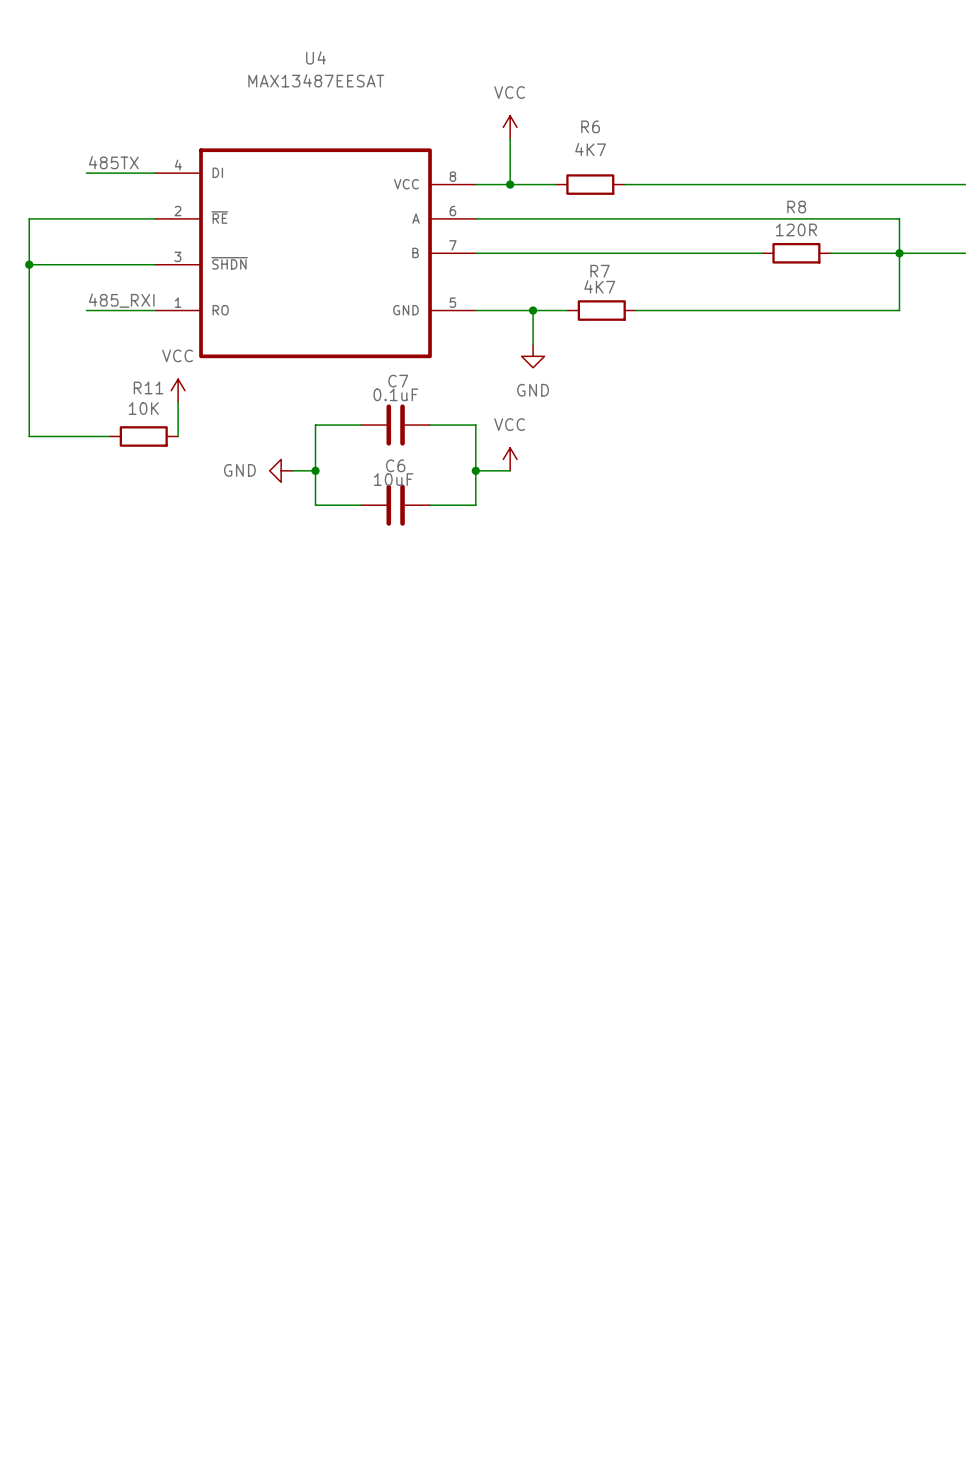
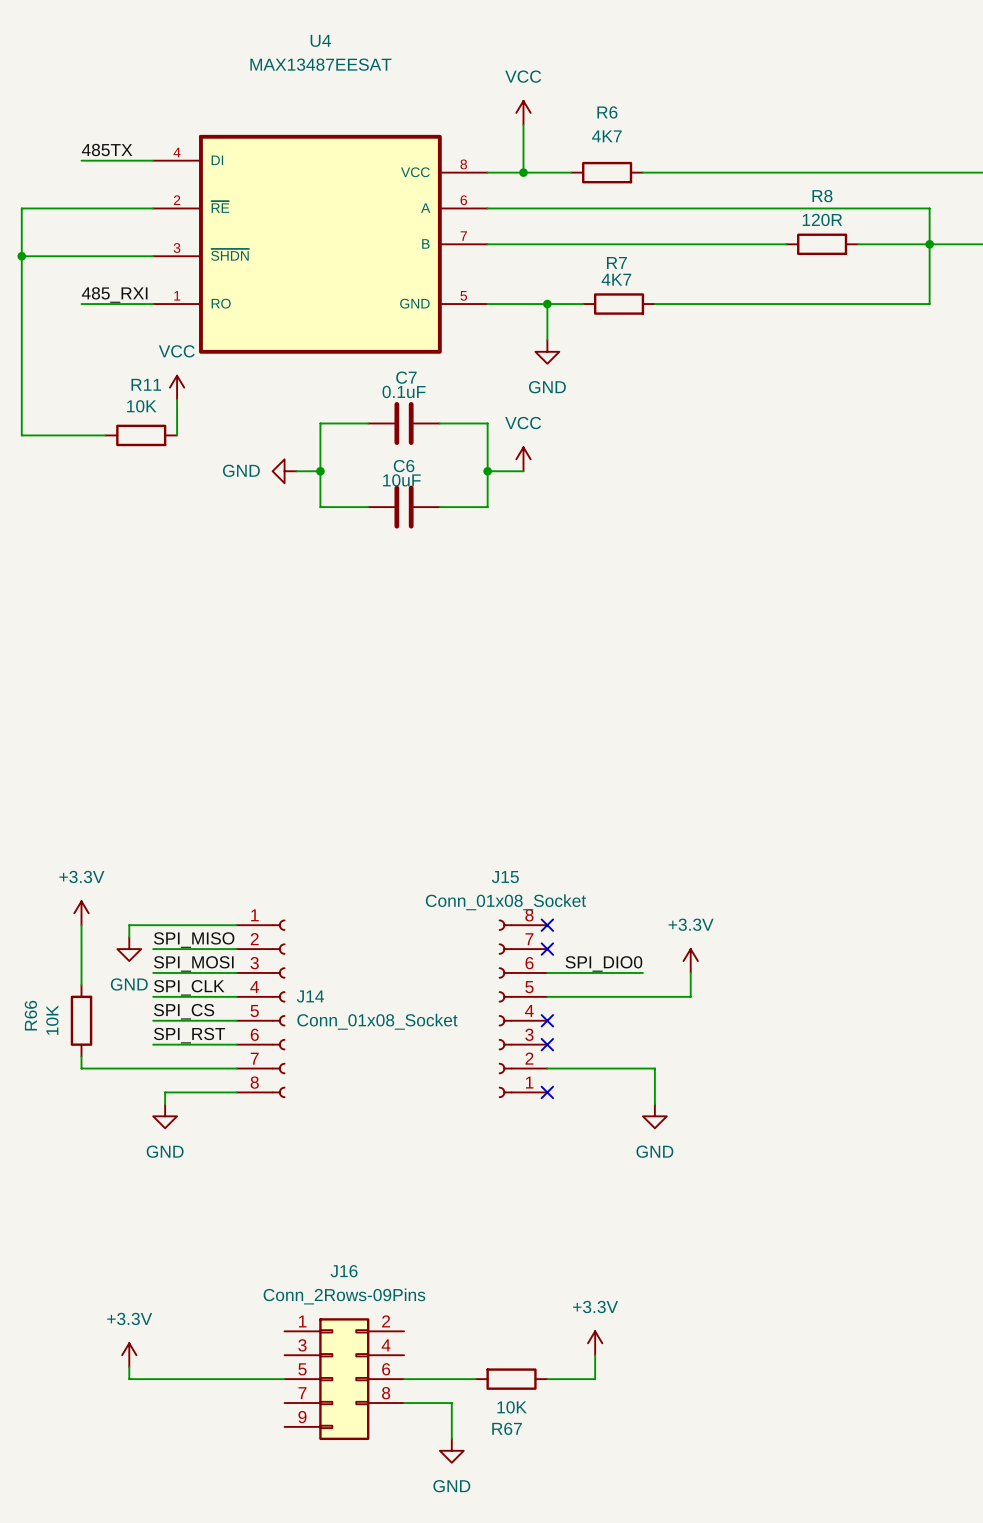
power symbol: none -> +3.3V (81, 913)
wire: none -> (81, 925) (81, 984)
wire: none -> (236, 925) (129, 925) (129, 937)
no-connect mark: none -> (547, 925)
label: none -> SPI_MISO (194, 940)
power symbol: none -> GND (129, 949)
wire: none -> (153, 949) (236, 949)
no-connect mark: none -> (547, 949)
power symbol: none -> +3.3V (690, 961)
label: none -> SPI_MOSI (193, 963)
label: none -> SPI_DIO0 (603, 963)
wire: none -> (153, 972) (236, 972)
wire: none -> (547, 972) (642, 972)
wire: none -> (690, 972) (690, 996) (547, 996)
label: none -> SPI_CLK (189, 987)
wire: none -> (153, 996) (236, 996)
J14: none -> Conn_01x08_Socket (261, 1008)
J15: none -> Conn_01x08_Socket (523, 1008)
label: none -> SPI_CS (184, 1011)
R66: none -> 10K (81, 1020)
wire: none -> (153, 1020) (236, 1020)
no-connect mark: none -> (547, 1020)
label: none -> SPI_RST (189, 1035)
wire: none -> (153, 1044) (236, 1044)
no-connect mark: none -> (547, 1044)
wire: none -> (81, 1056) (81, 1068) (236, 1068)
wire: none -> (547, 1068) (654, 1068) (654, 1104)
wire: none -> (236, 1092) (165, 1092) (165, 1104)
no-connect mark: none -> (547, 1092)
power symbol: none -> GND (165, 1116)
power symbol: none -> GND (654, 1116)
power symbol: none -> +3.3V (595, 1343)
power symbol: none -> +3.3V (129, 1355)
wire: none -> (595, 1355) (595, 1379) (547, 1379)
wire: none -> (129, 1367) (129, 1379) (284, 1379)
J16: none -> Conn_2Rows-09Pins (344, 1379)
wire: none -> (404, 1379) (475, 1379)
R67: none -> 10K (511, 1379)
wire: none -> (404, 1403) (451, 1403) (451, 1438)
power symbol: none -> GND (451, 1450)

